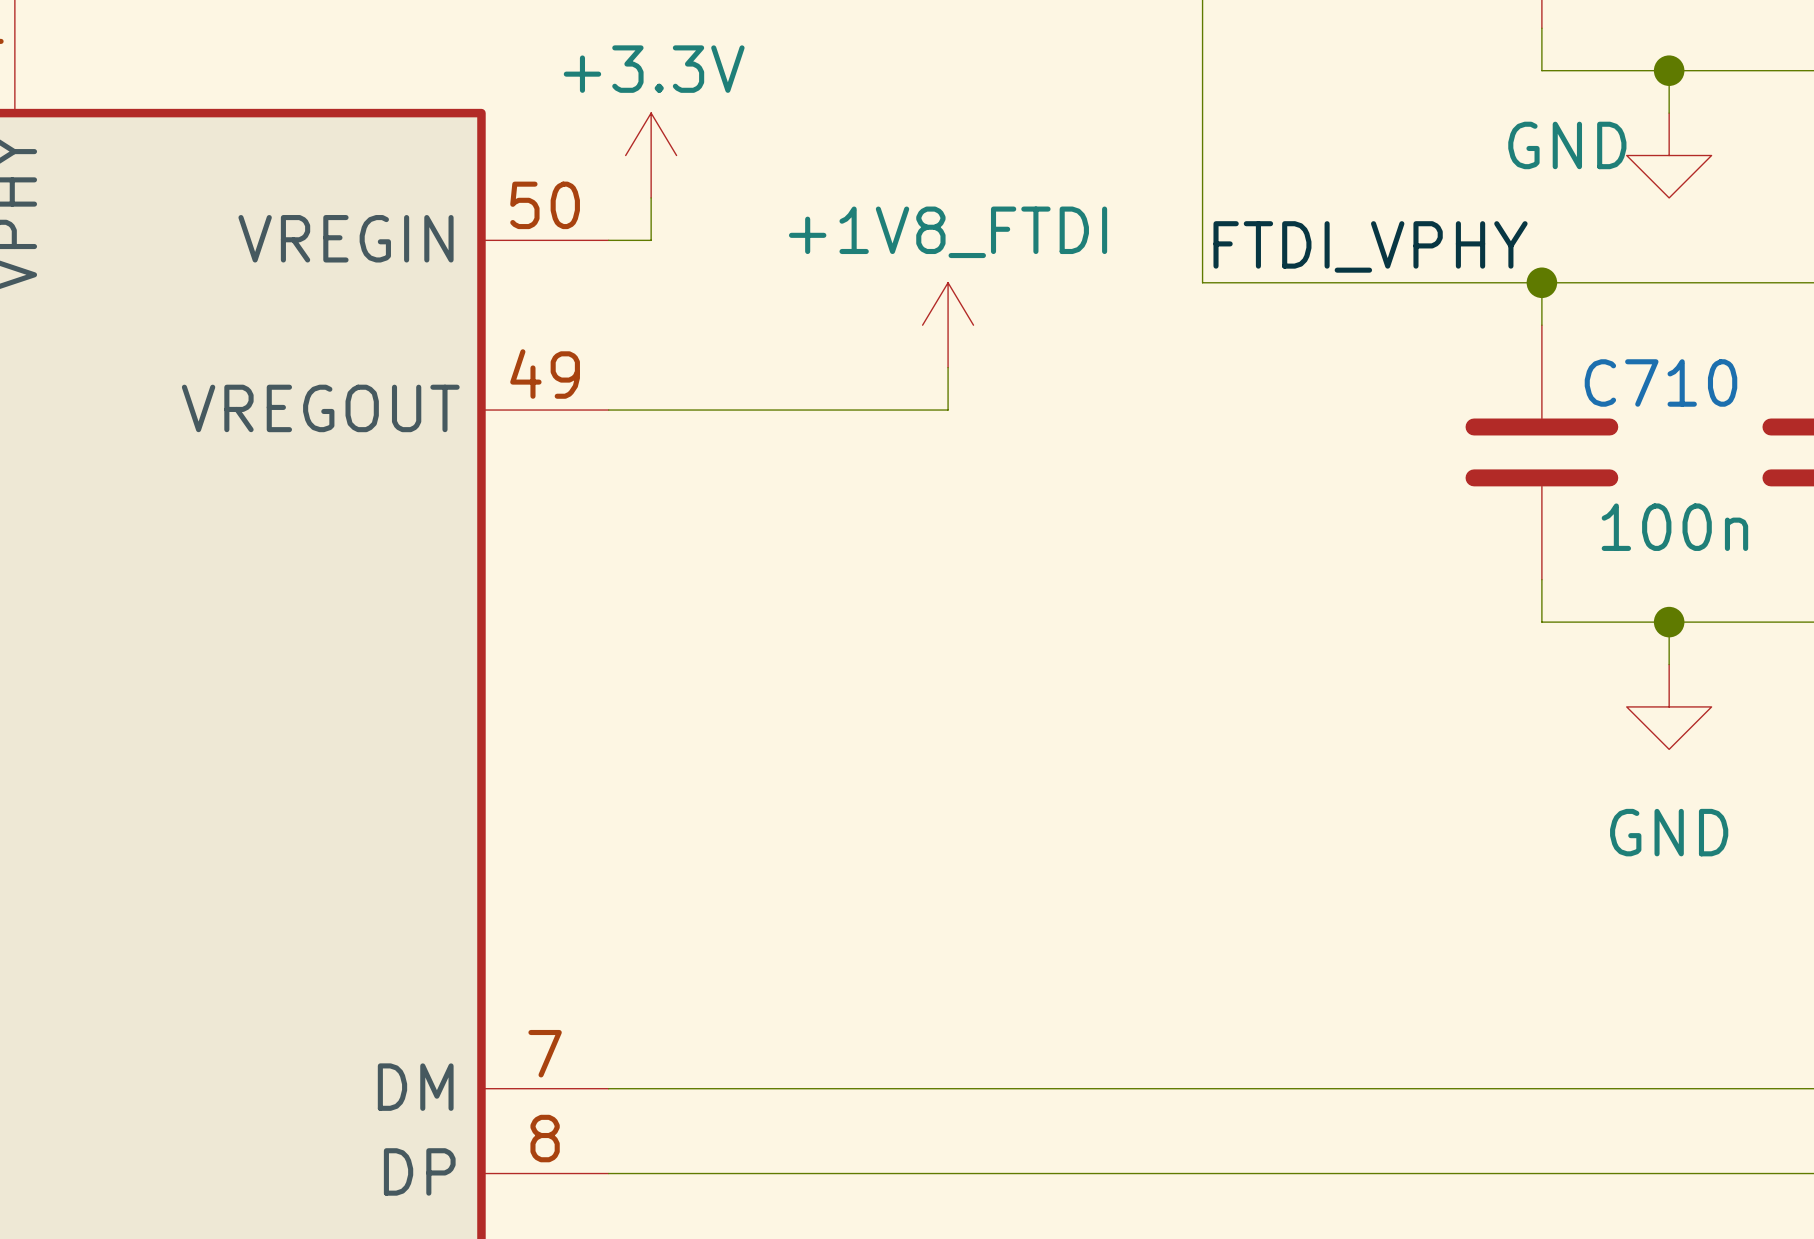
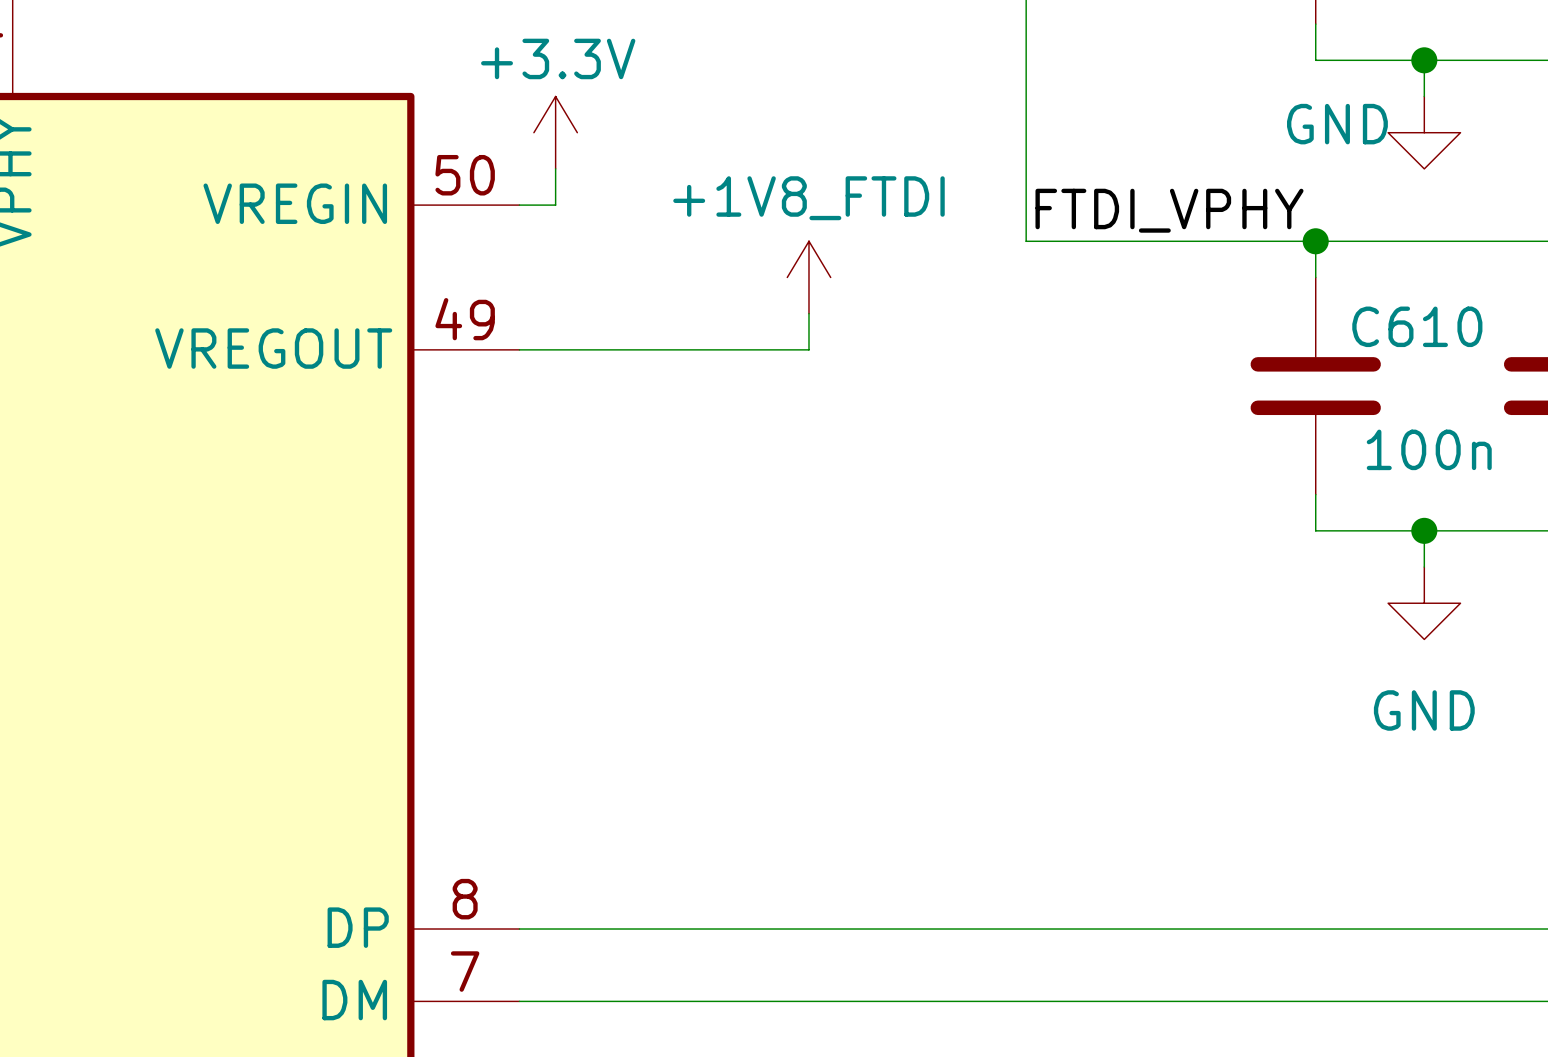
C710 name: C710 (1660, 382) -> C610 (1417, 326)
part pin number: 7 (545, 1053) -> 8 (465, 899)
part pin name: DM (415, 1087) -> DP (358, 927)
part pin number: 8 (545, 1138) -> 7 (465, 971)
part pin name: DP (419, 1171) -> DM (354, 1000)

